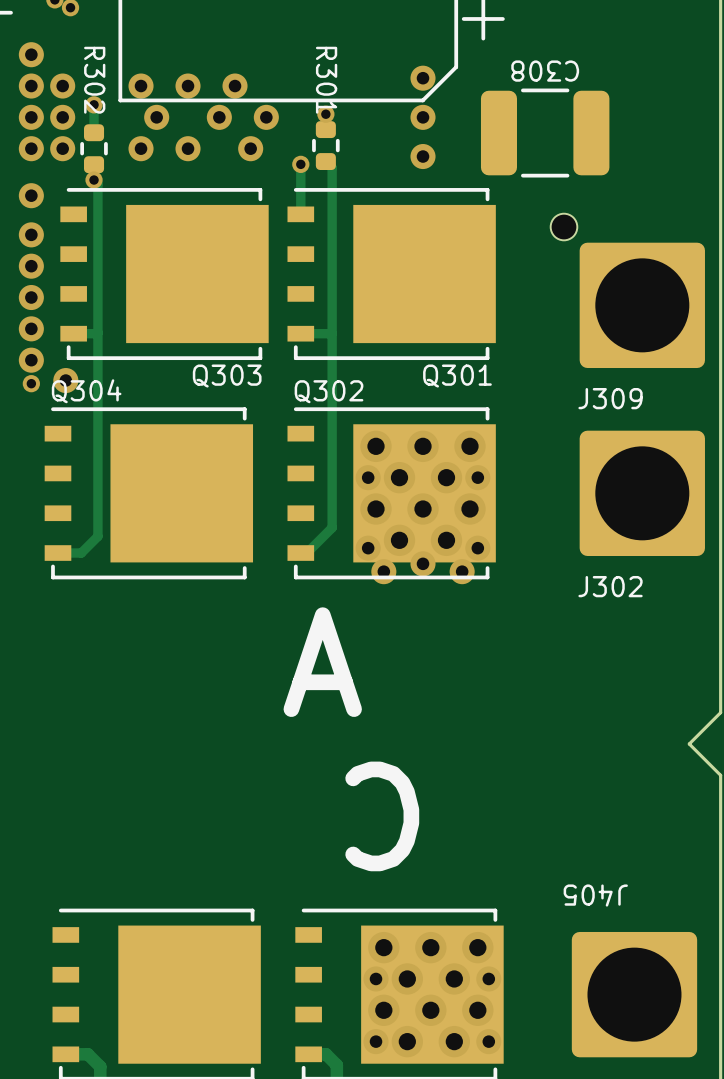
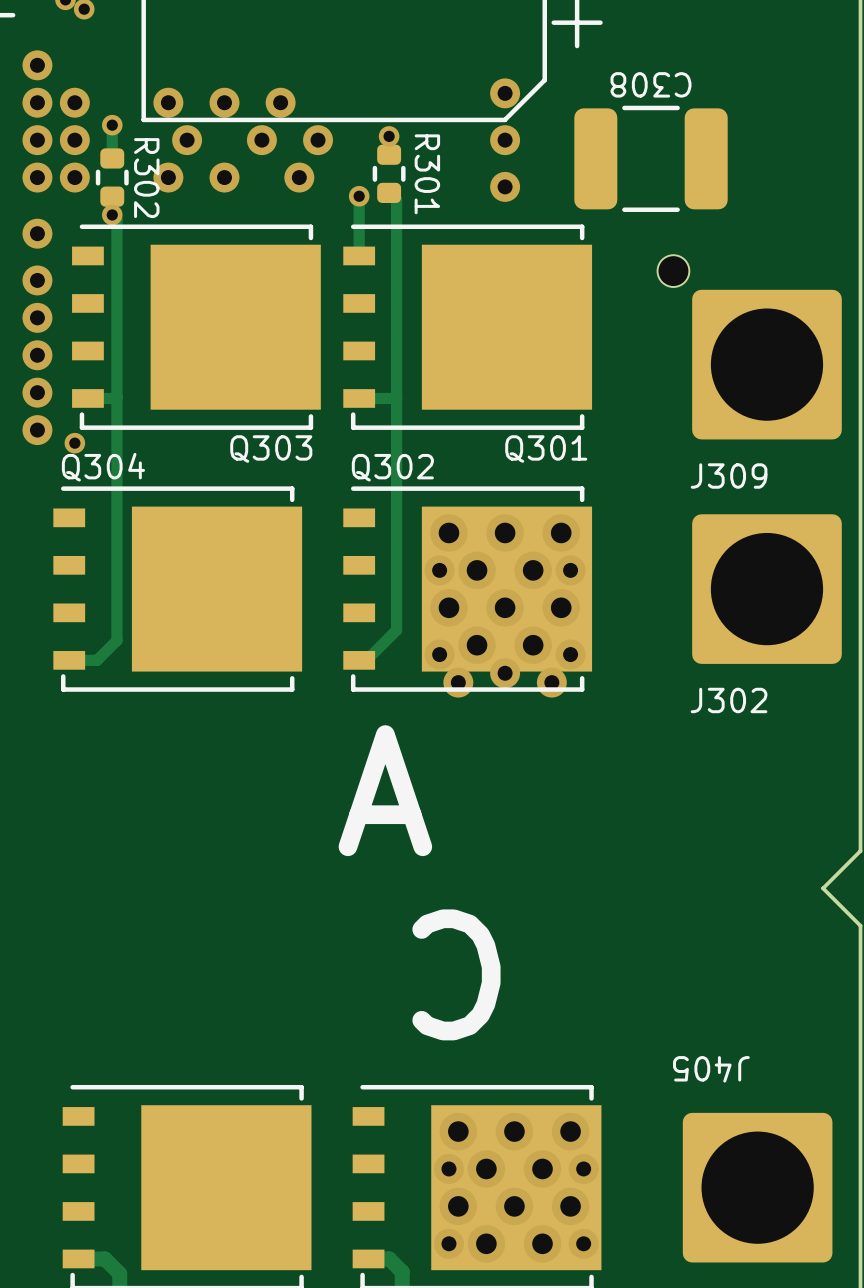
R302 name position: R302 (94, 80) -> R302 (146, 178)
R301 name position: R301 (326, 80) -> R301 (427, 174)
via: (65, 380) -> none
via position: (31, 383) -> (74, 443)

